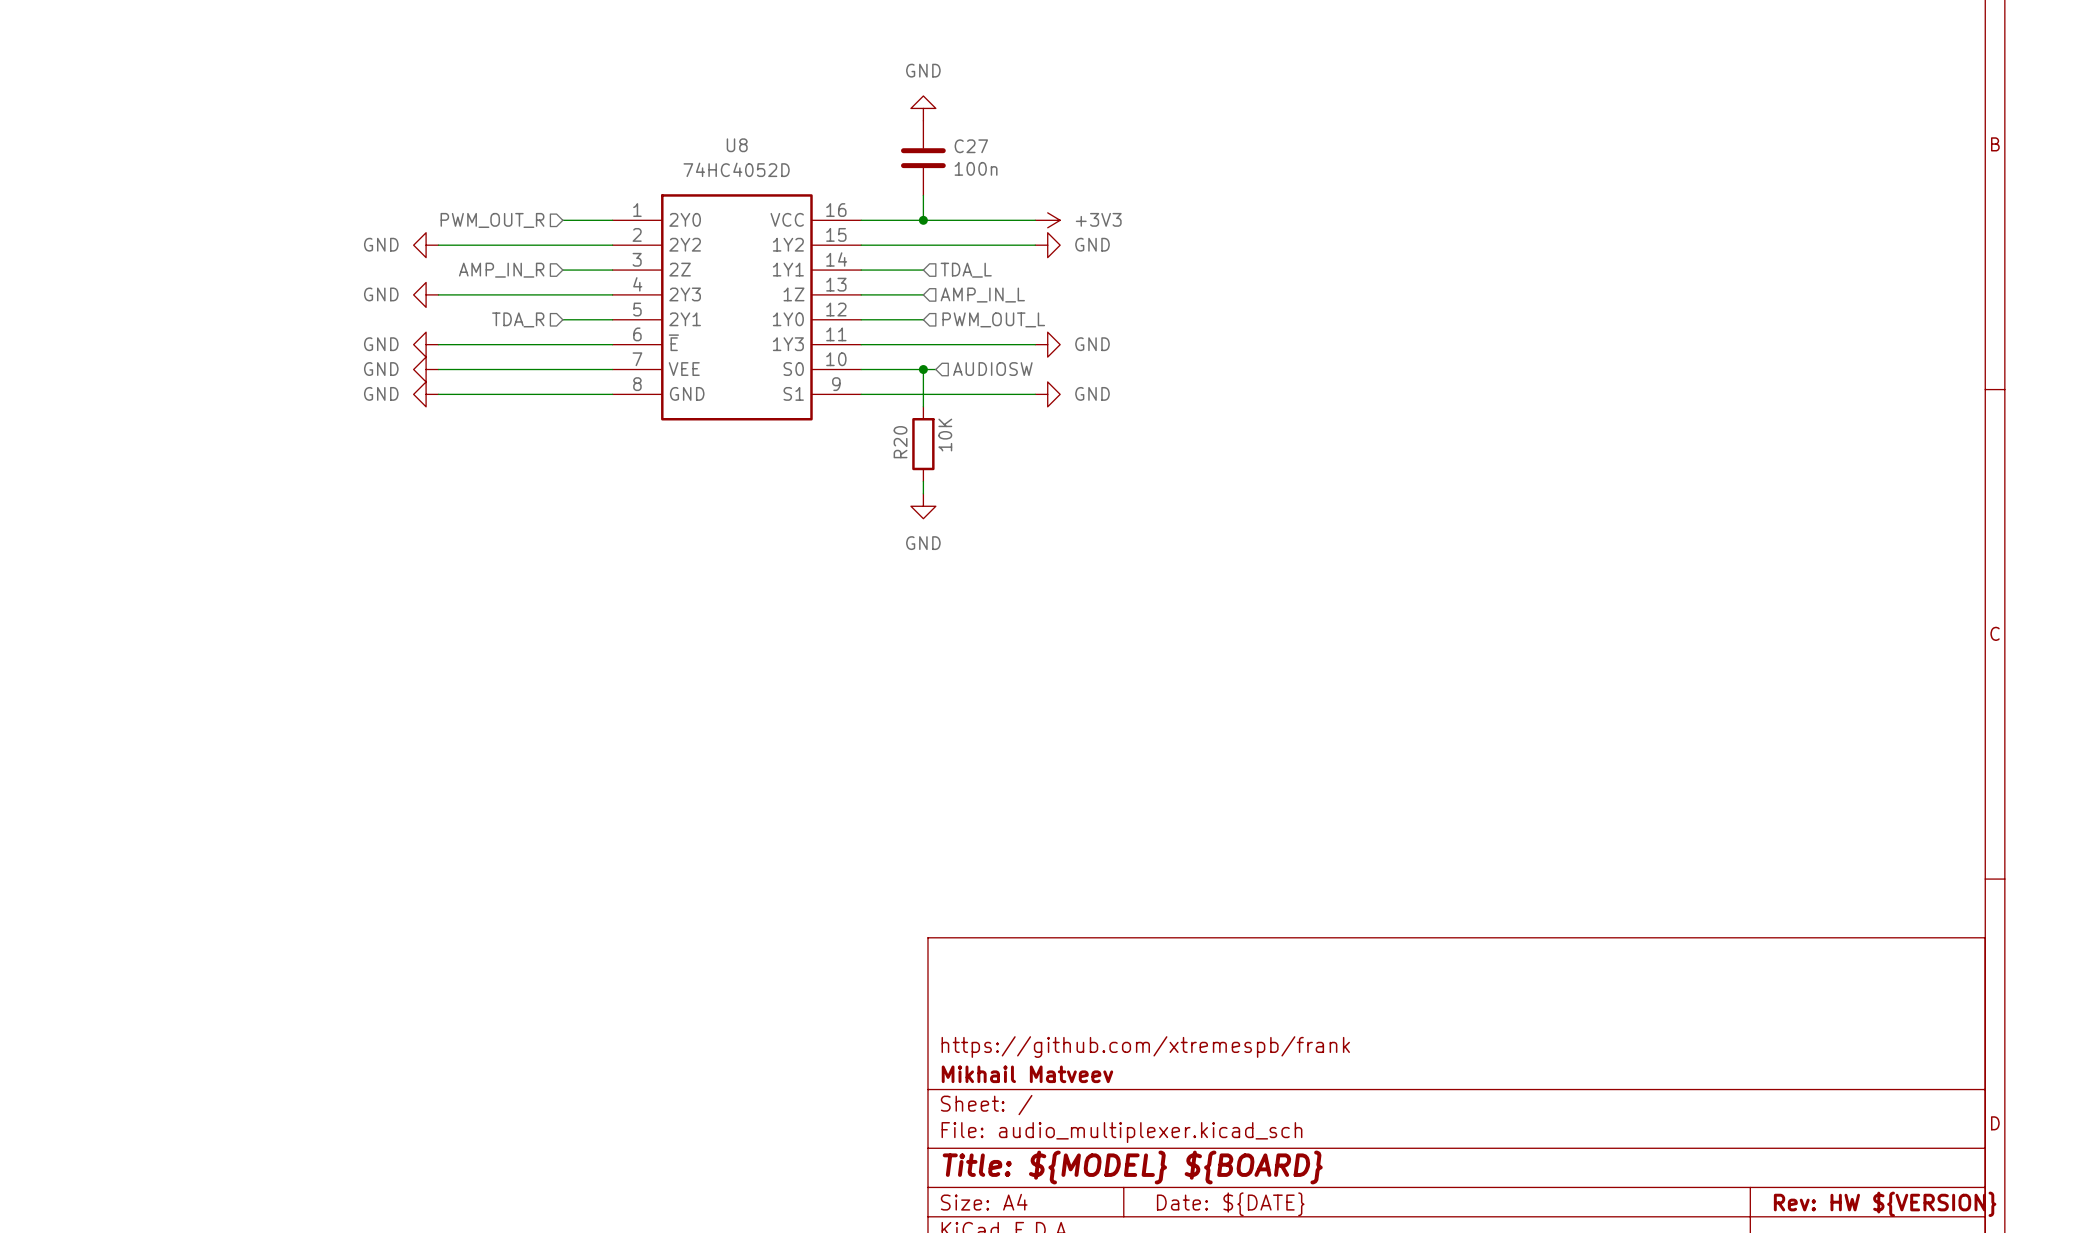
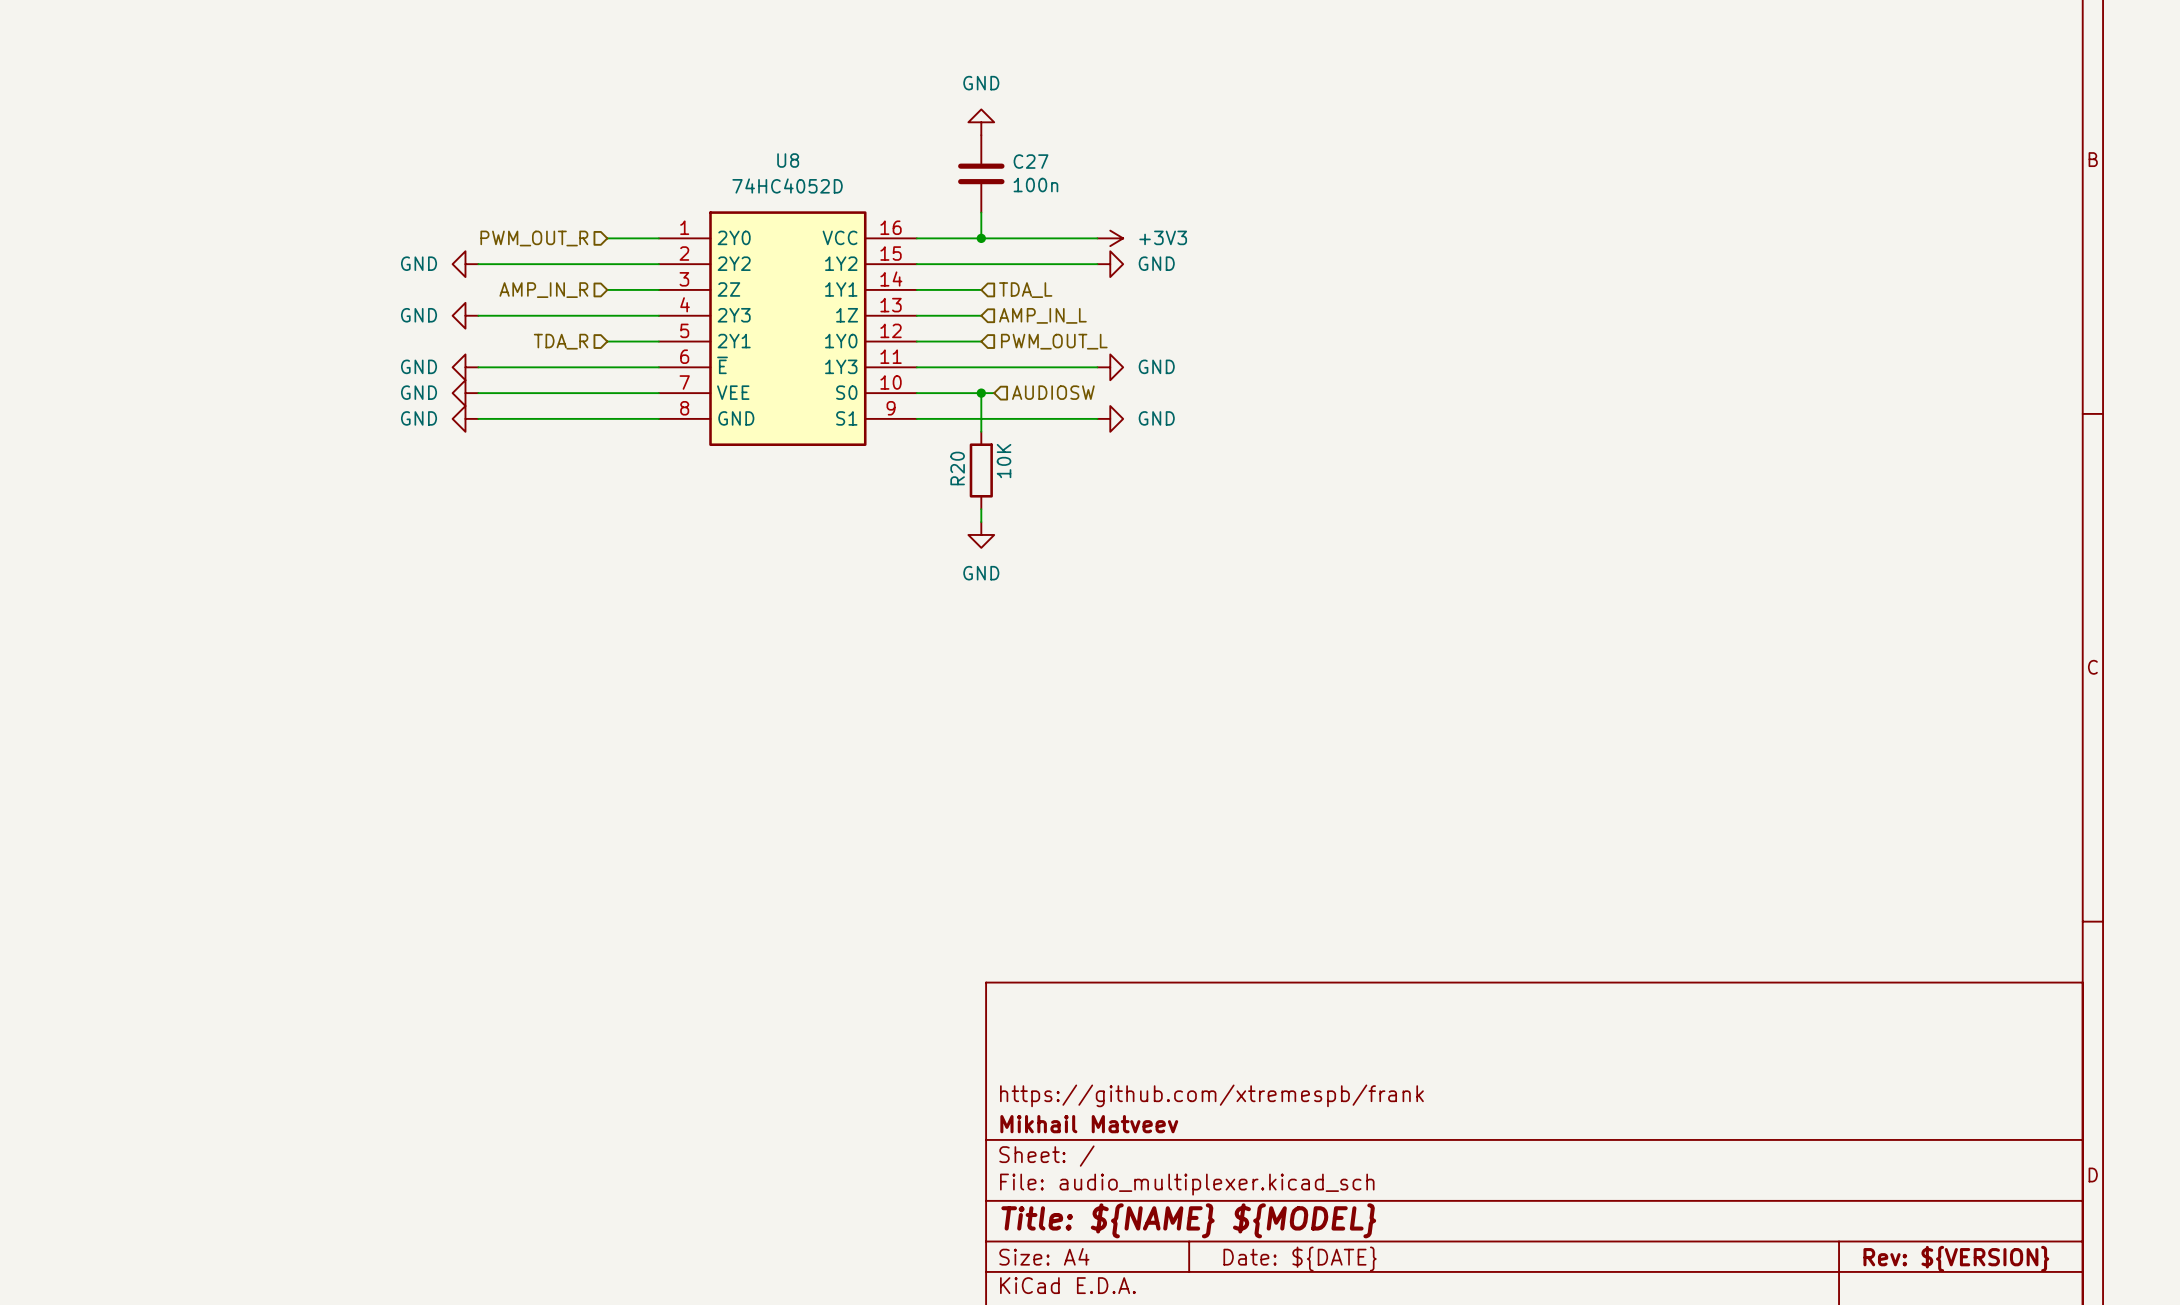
title block: Title: ${MODEL} ${BOARD} (1132, 1167) -> Title: ${NAME} ${MODEL} (1188, 1220)
title block: Rev: HW ${VERSION} (1885, 1204) -> Rev: ${VERSION} (1956, 1258)

